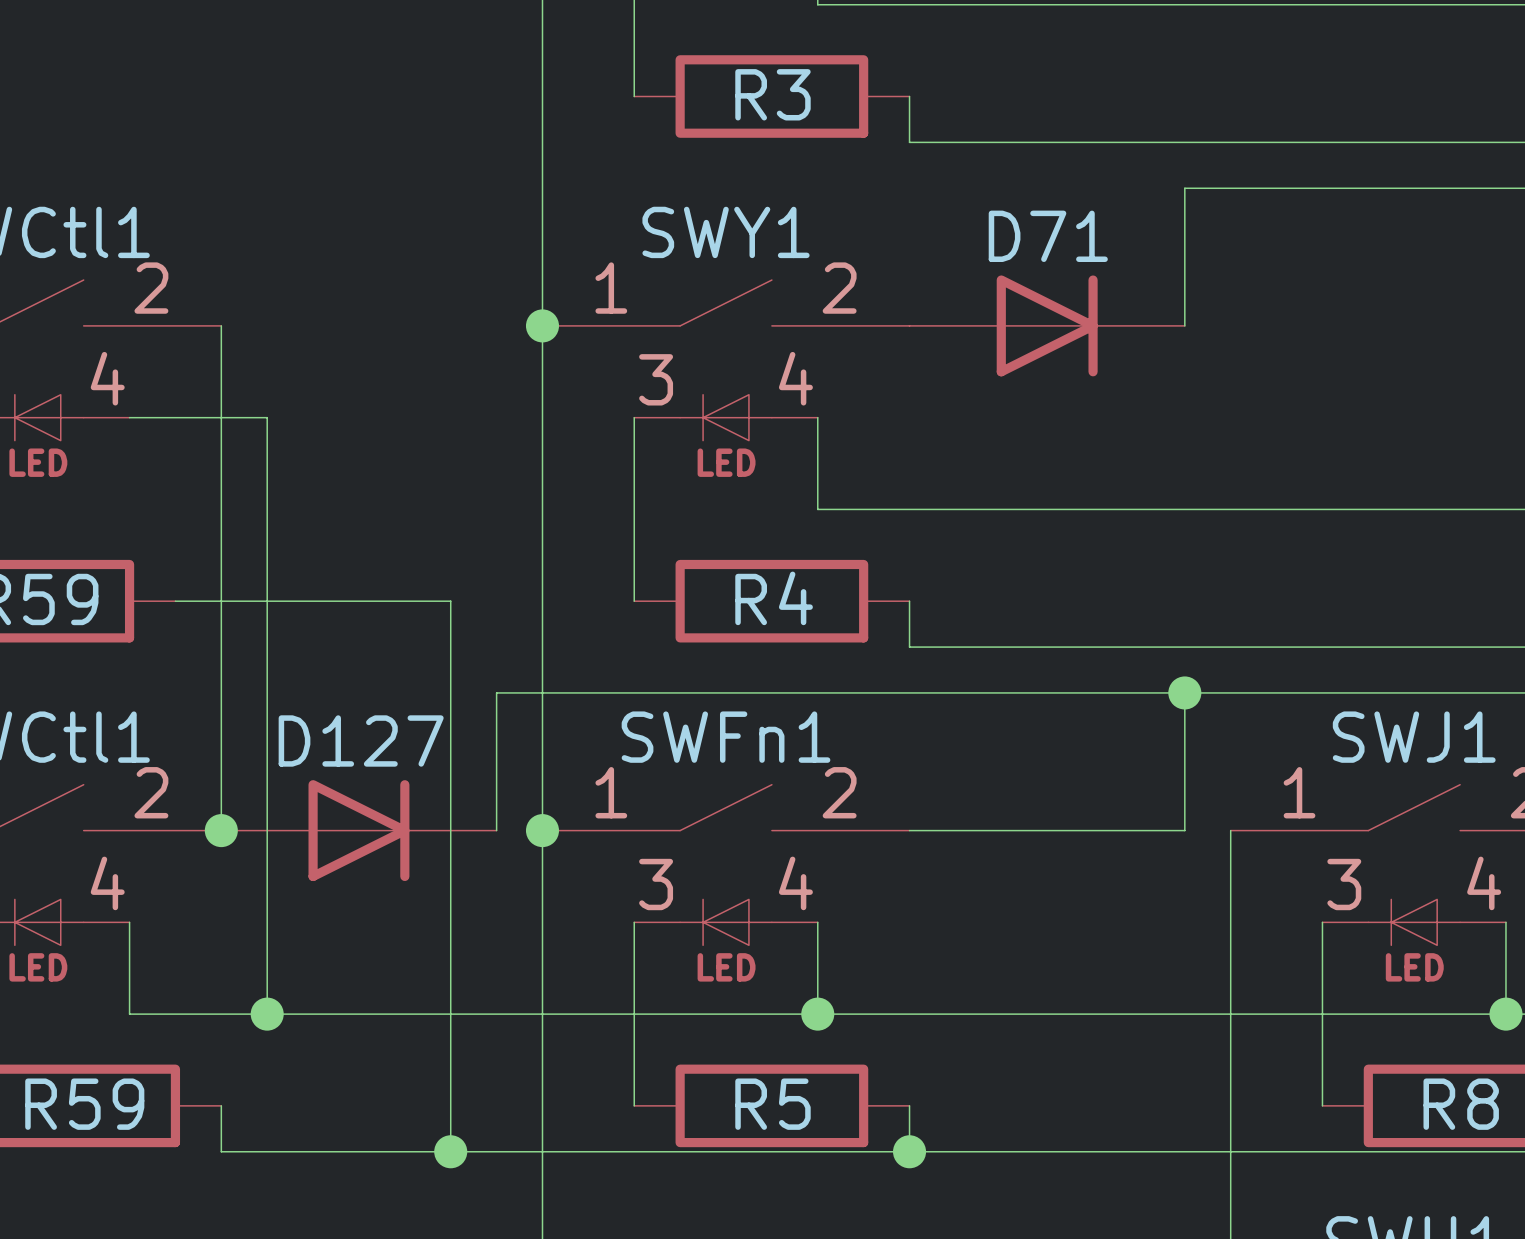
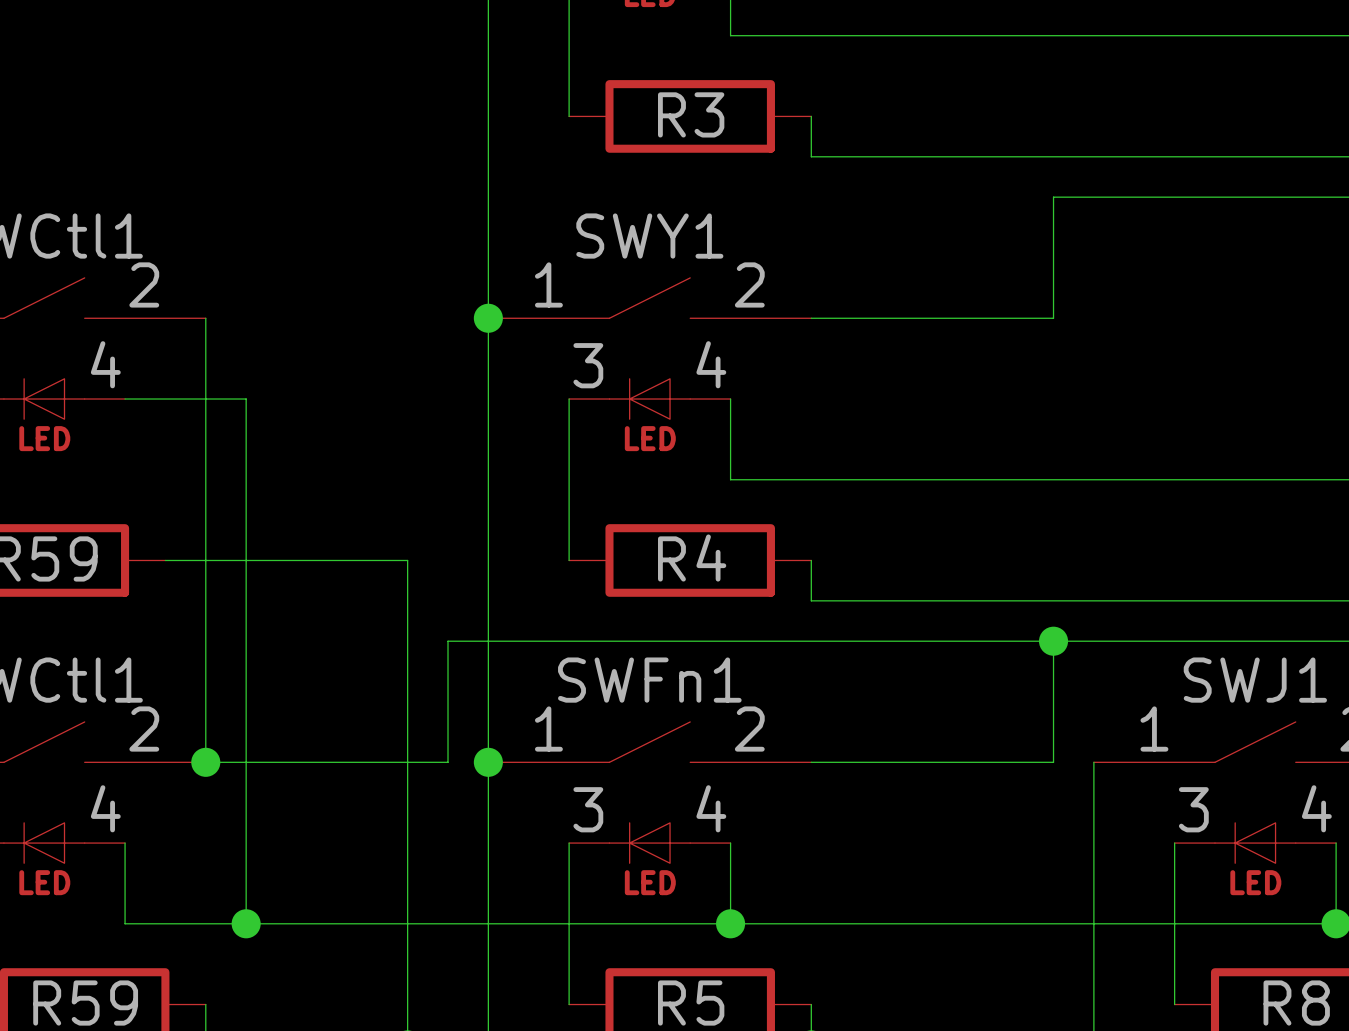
D71: (1047, 325) -> none
D127: (358, 830) -> none

